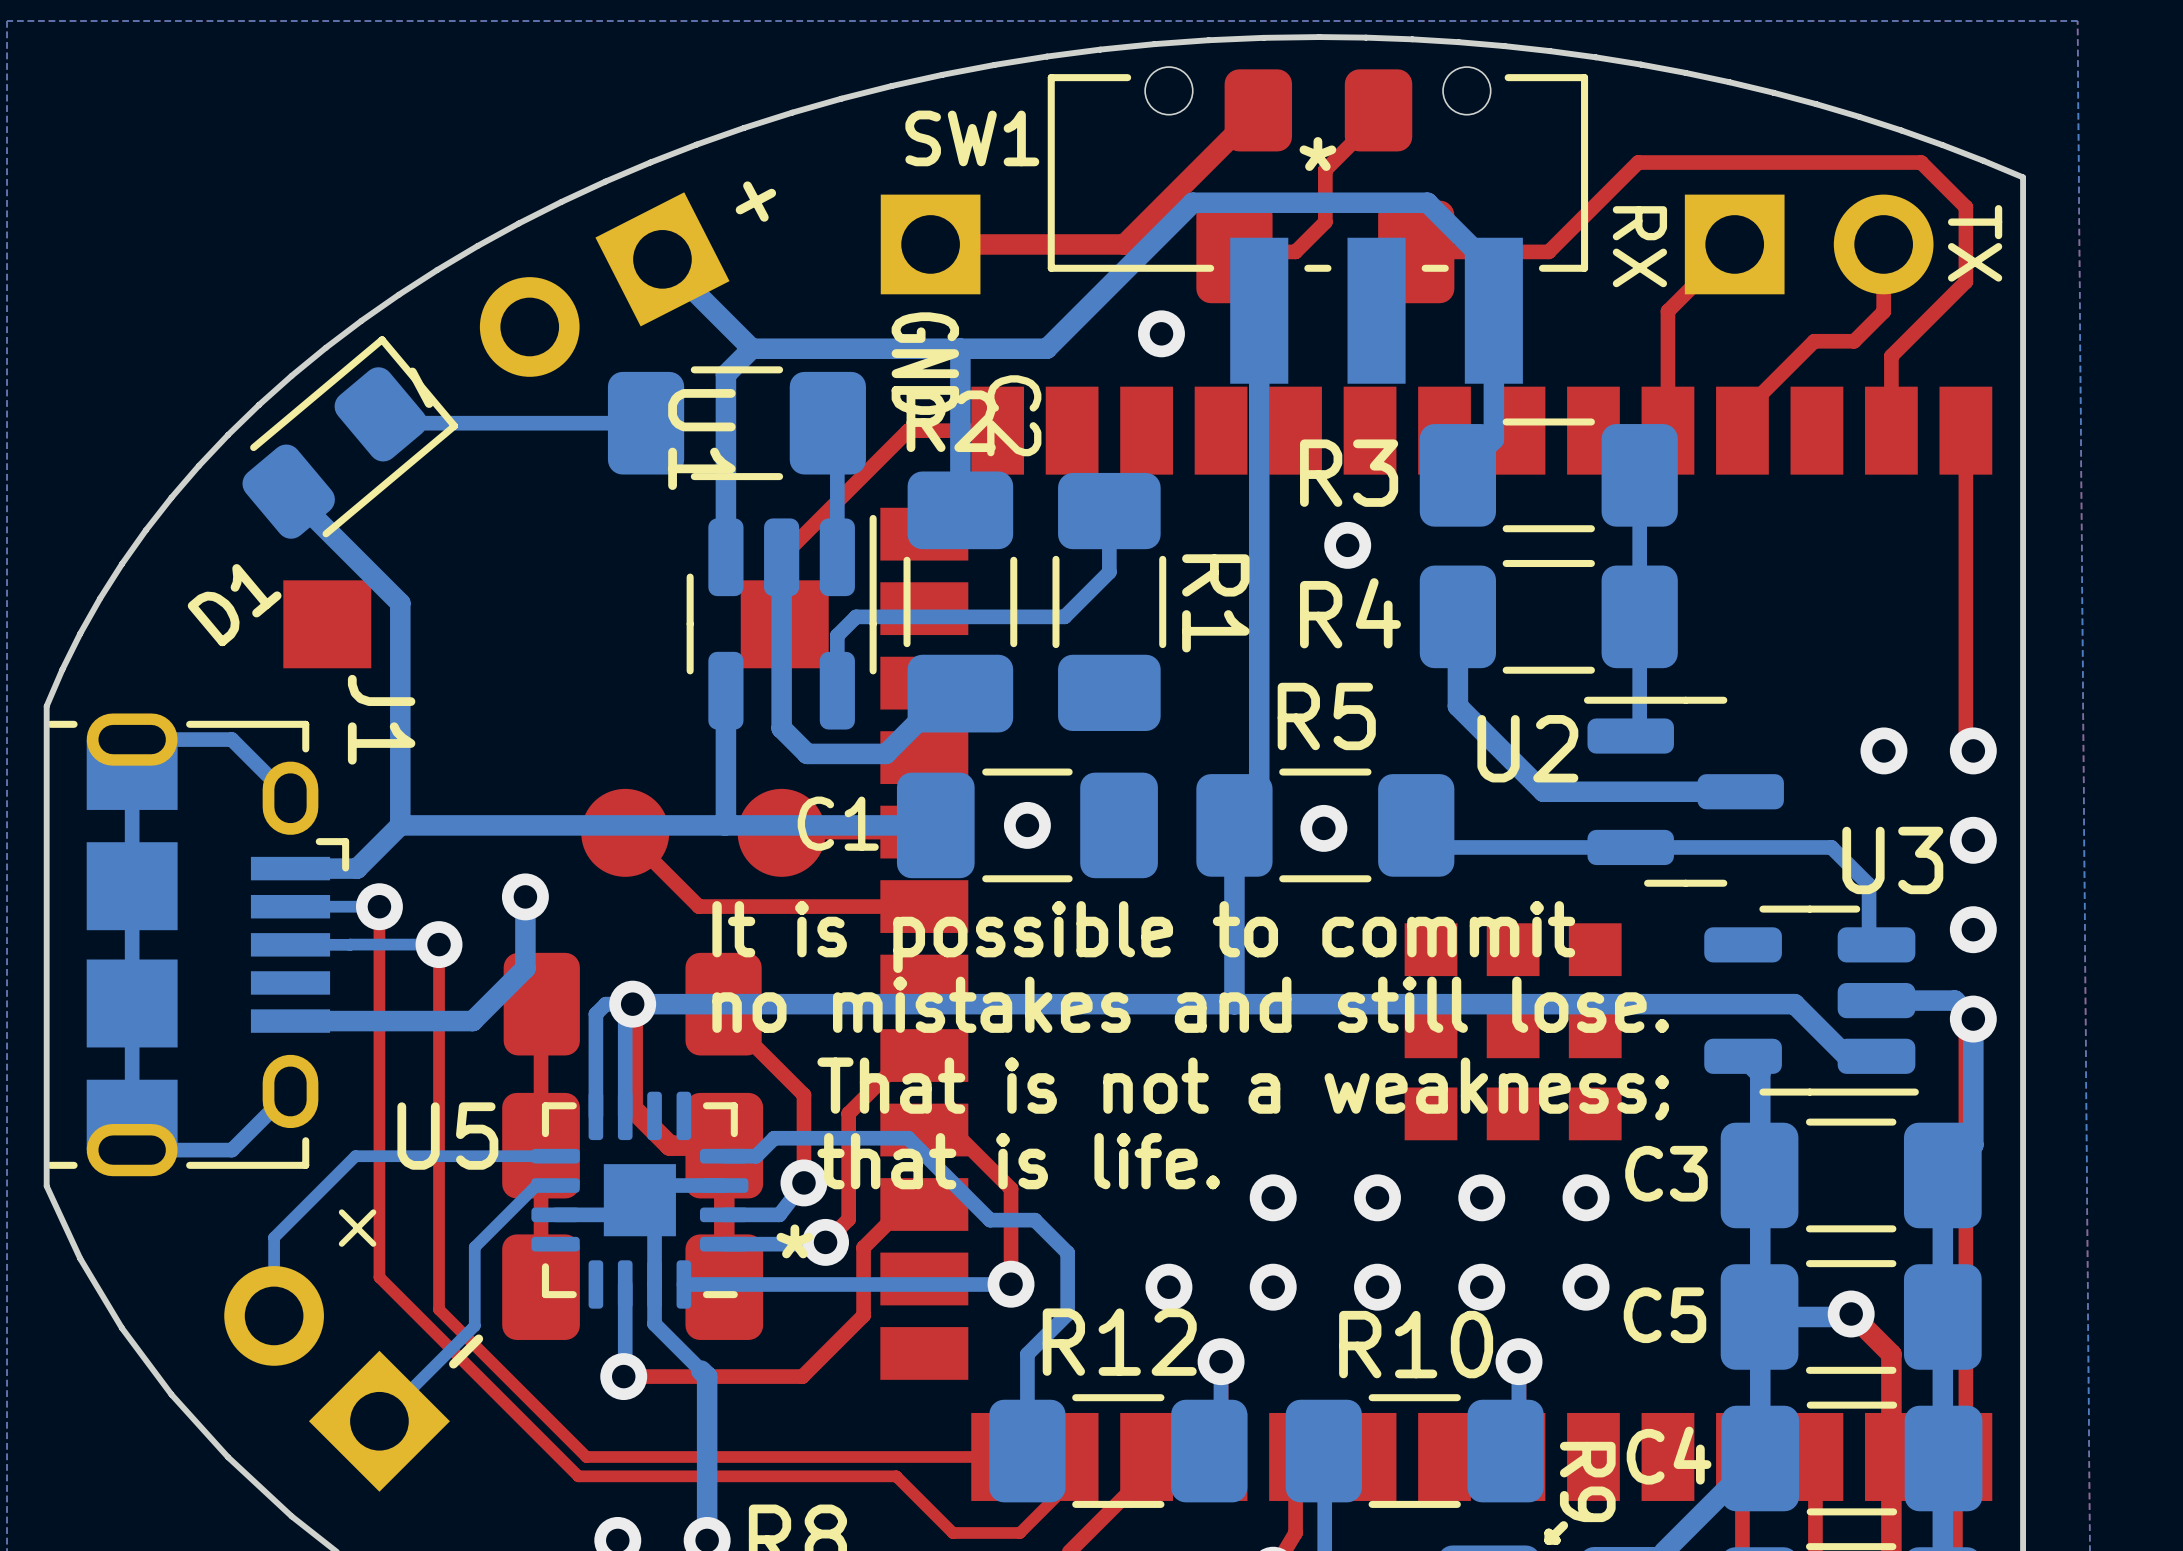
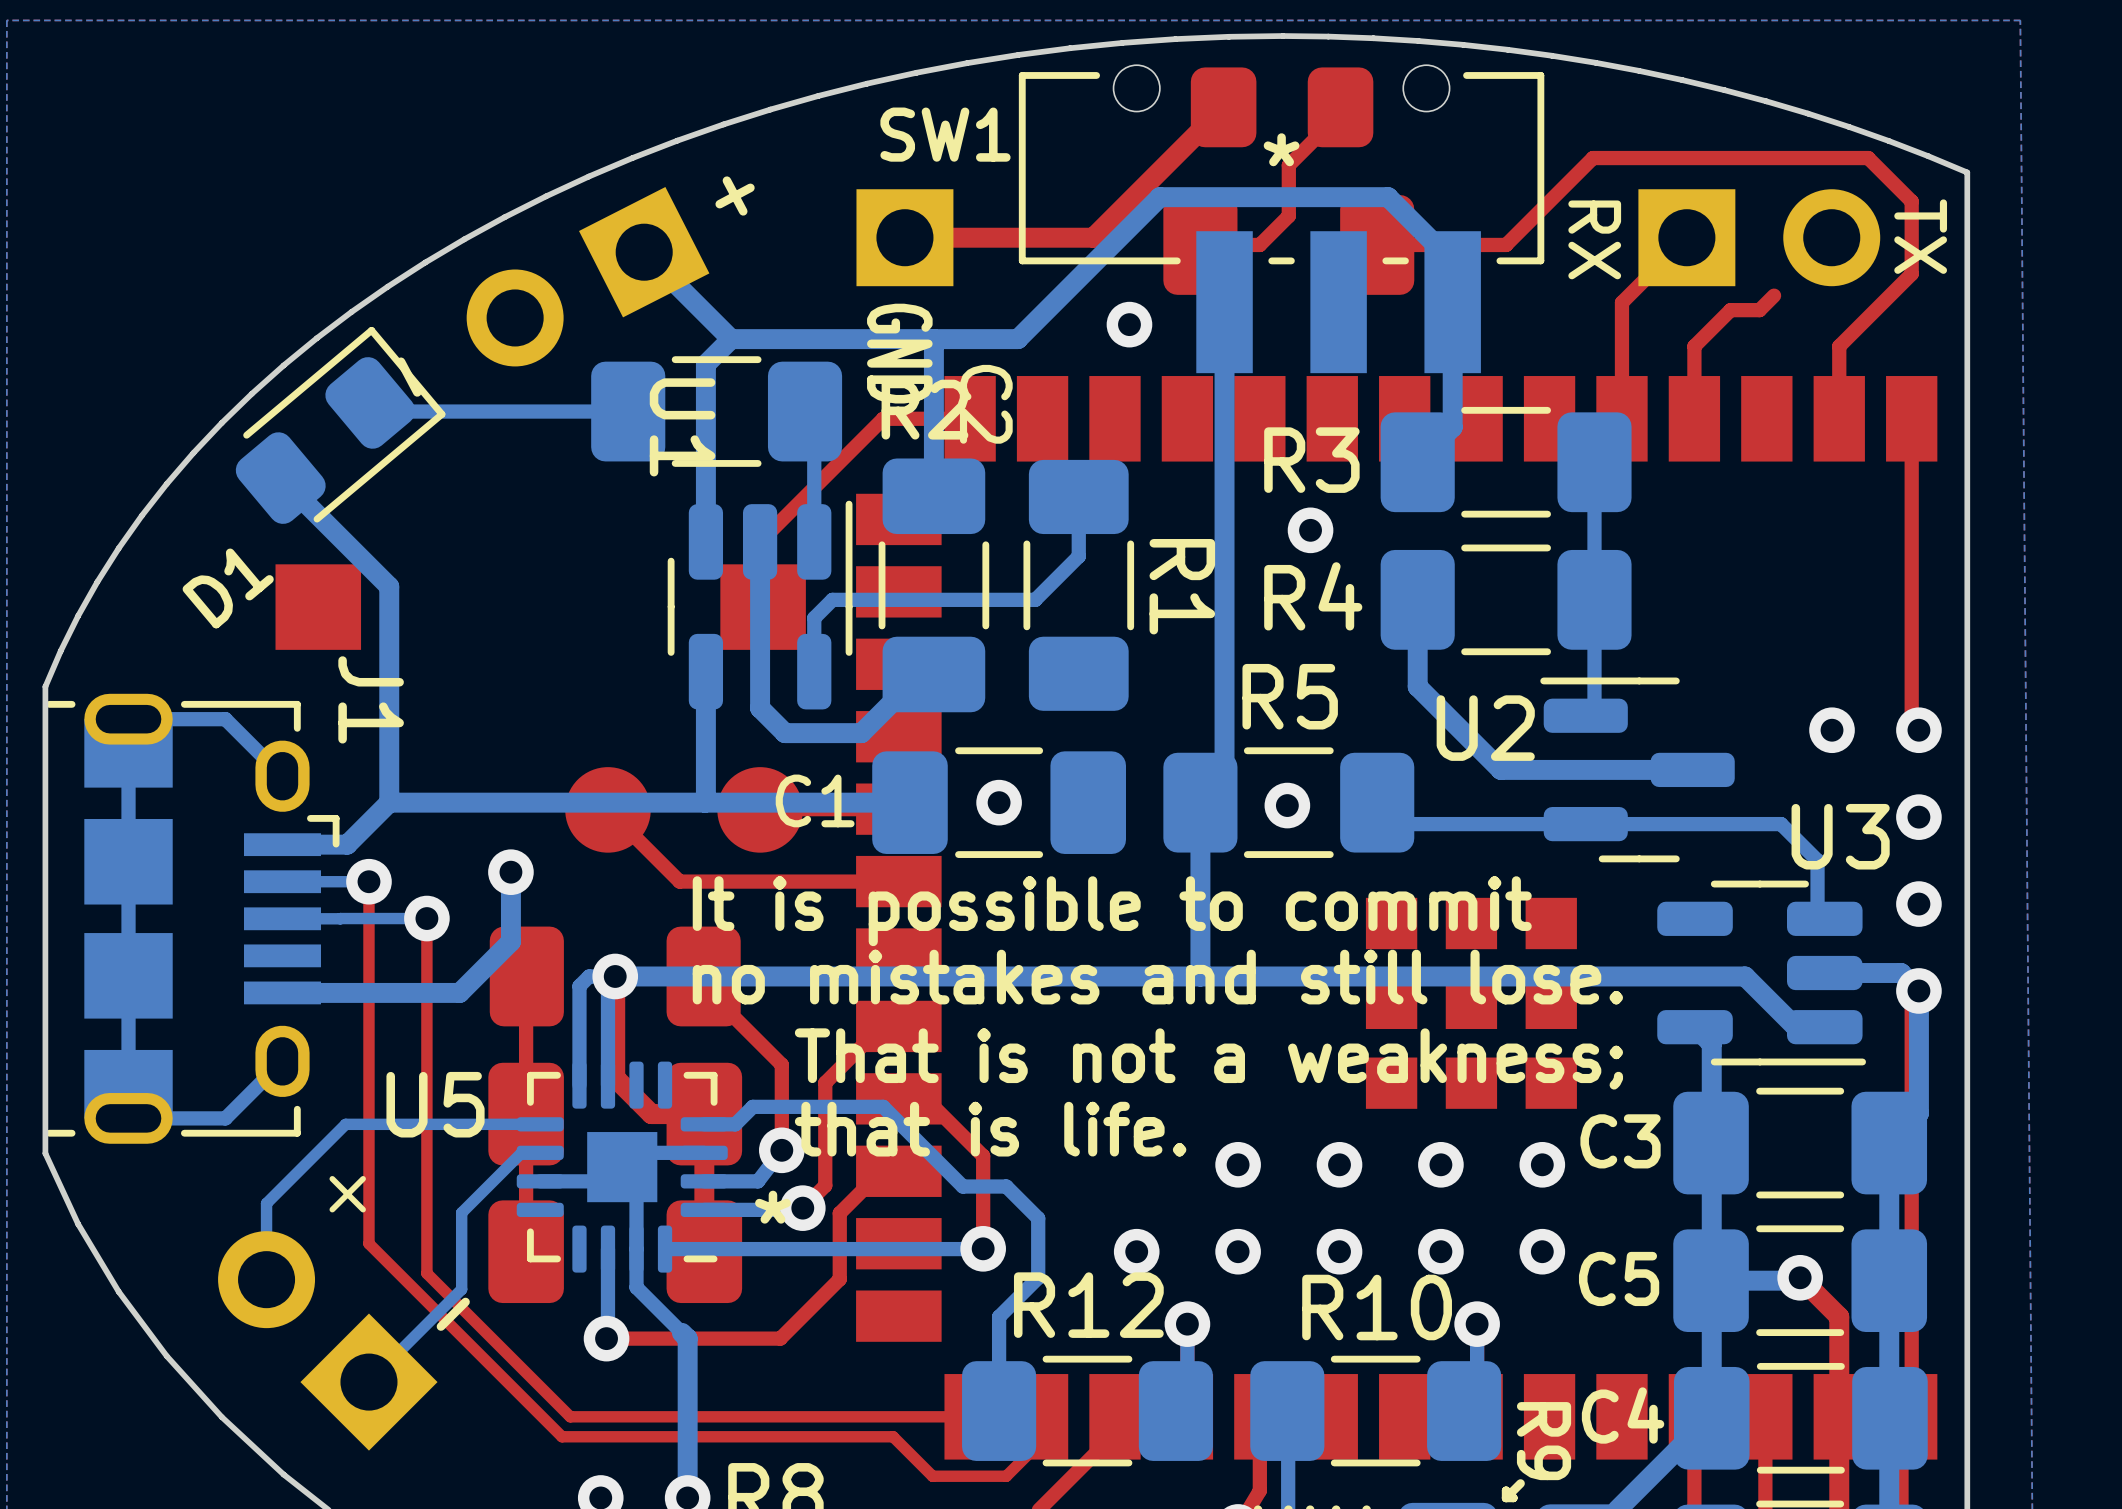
top track: (1883, 244) (1883, 311) (1854, 341) (1814, 341) (1742, 413) -> (1774, 295) (1759, 310) (1730, 310) (1694, 346) (1694, 401)
top track: (379, 1277) (578, 1476) (896, 1476) (952, 1532) (1019, 1532) (1034, 1518) -> (368, 1242) (562, 1436) (893, 1436) (932, 1476) (1006, 1476)

